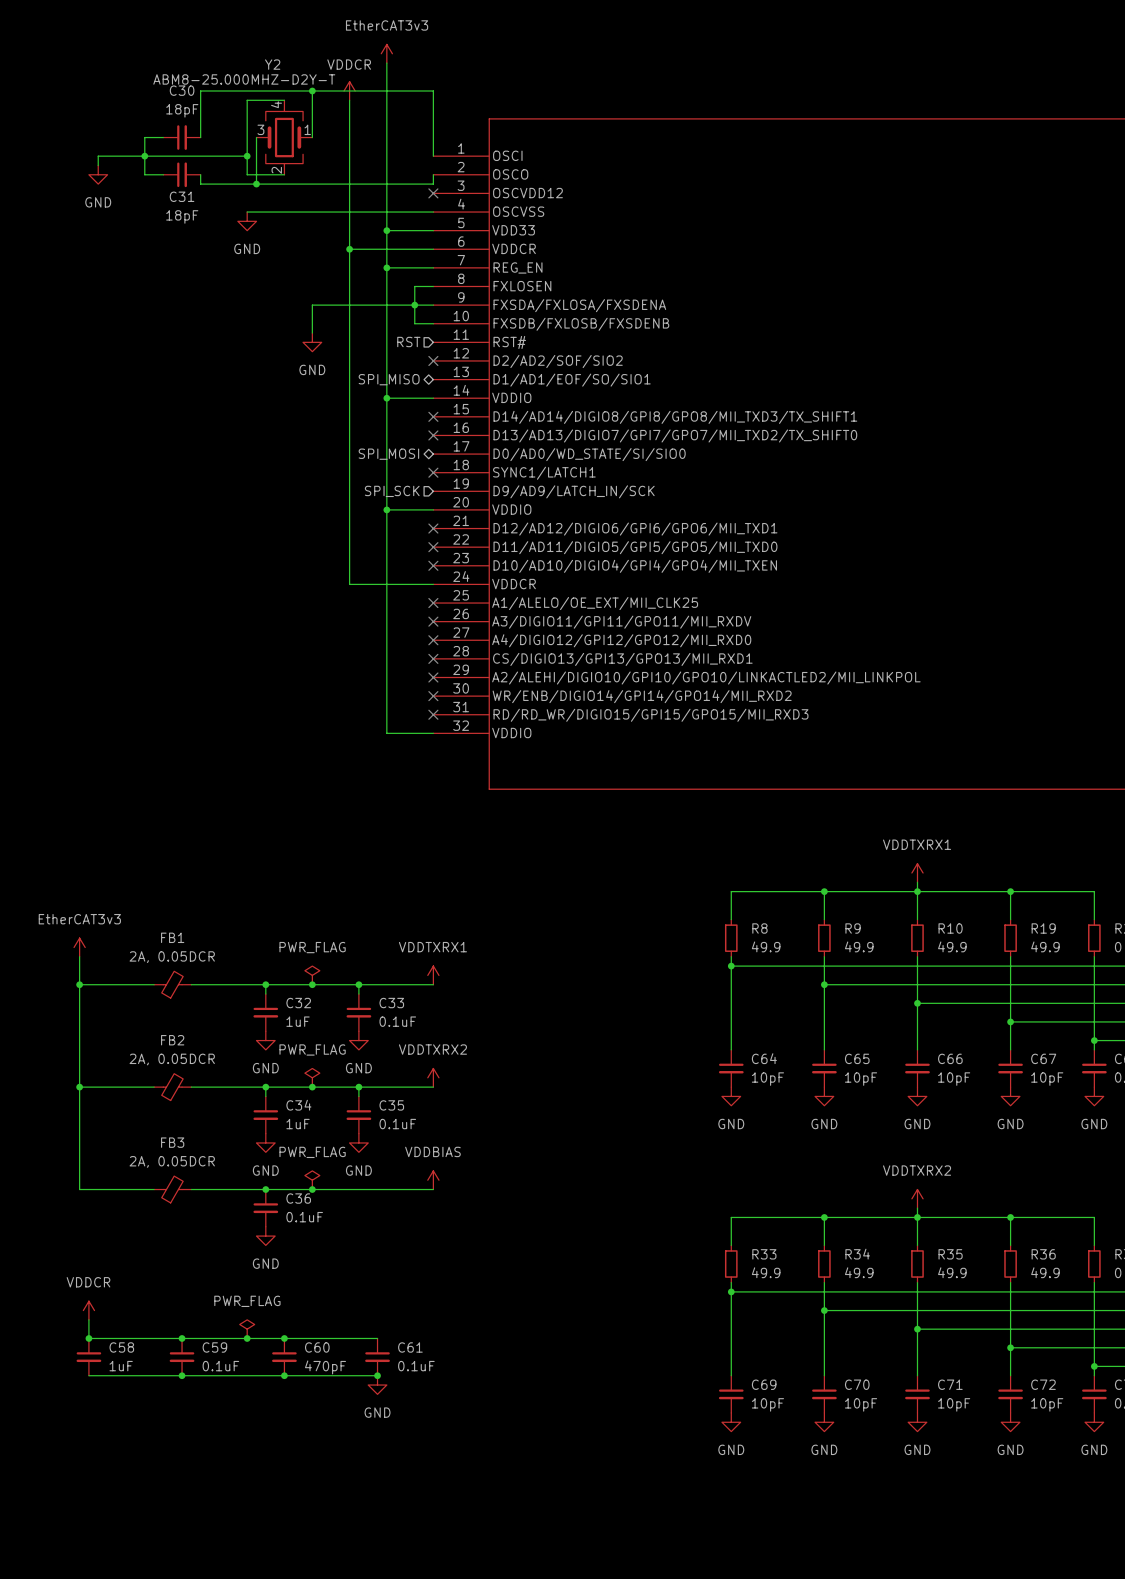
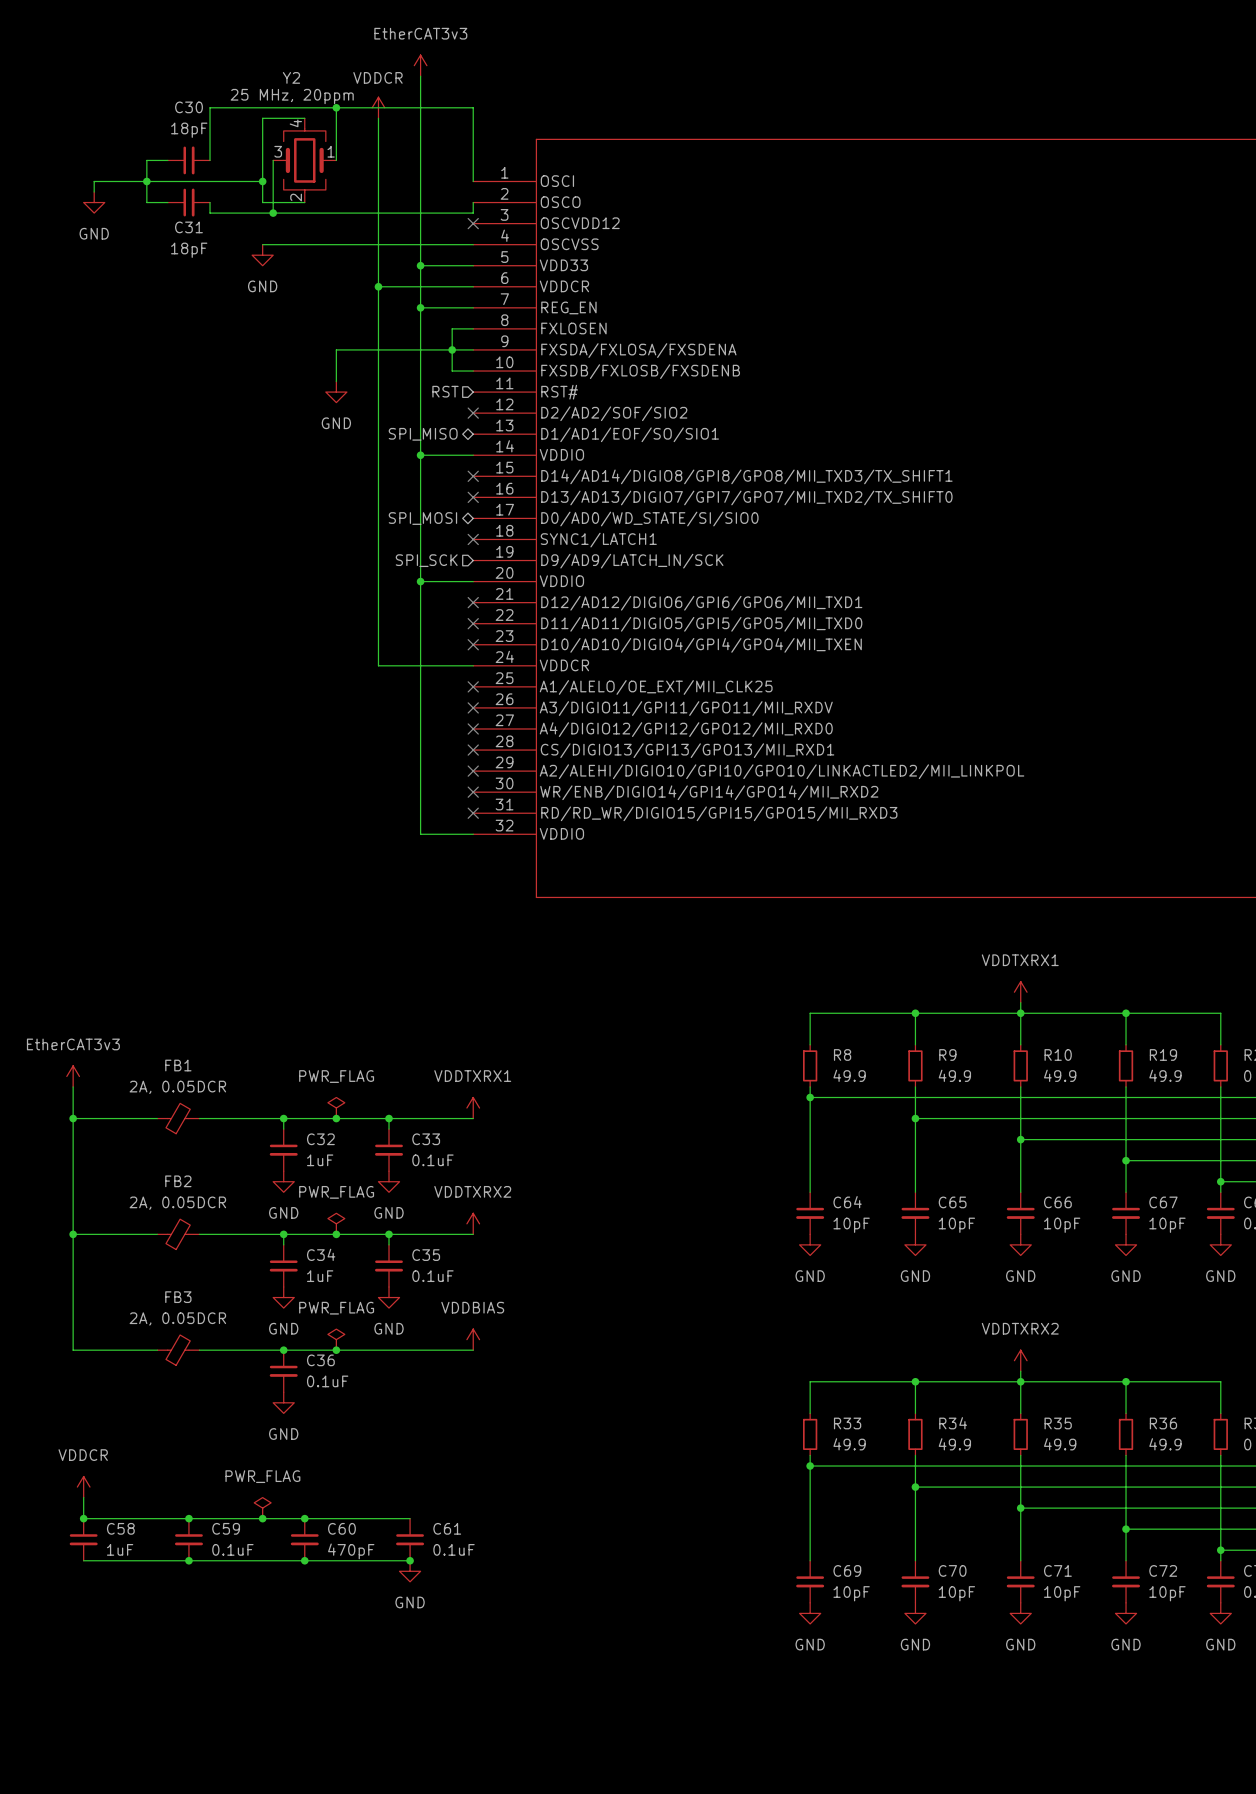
Y2 value: ABM8-25.000MHZ-D2Y-T (244, 79) -> 25 MHz, 20ppm (292, 96)

